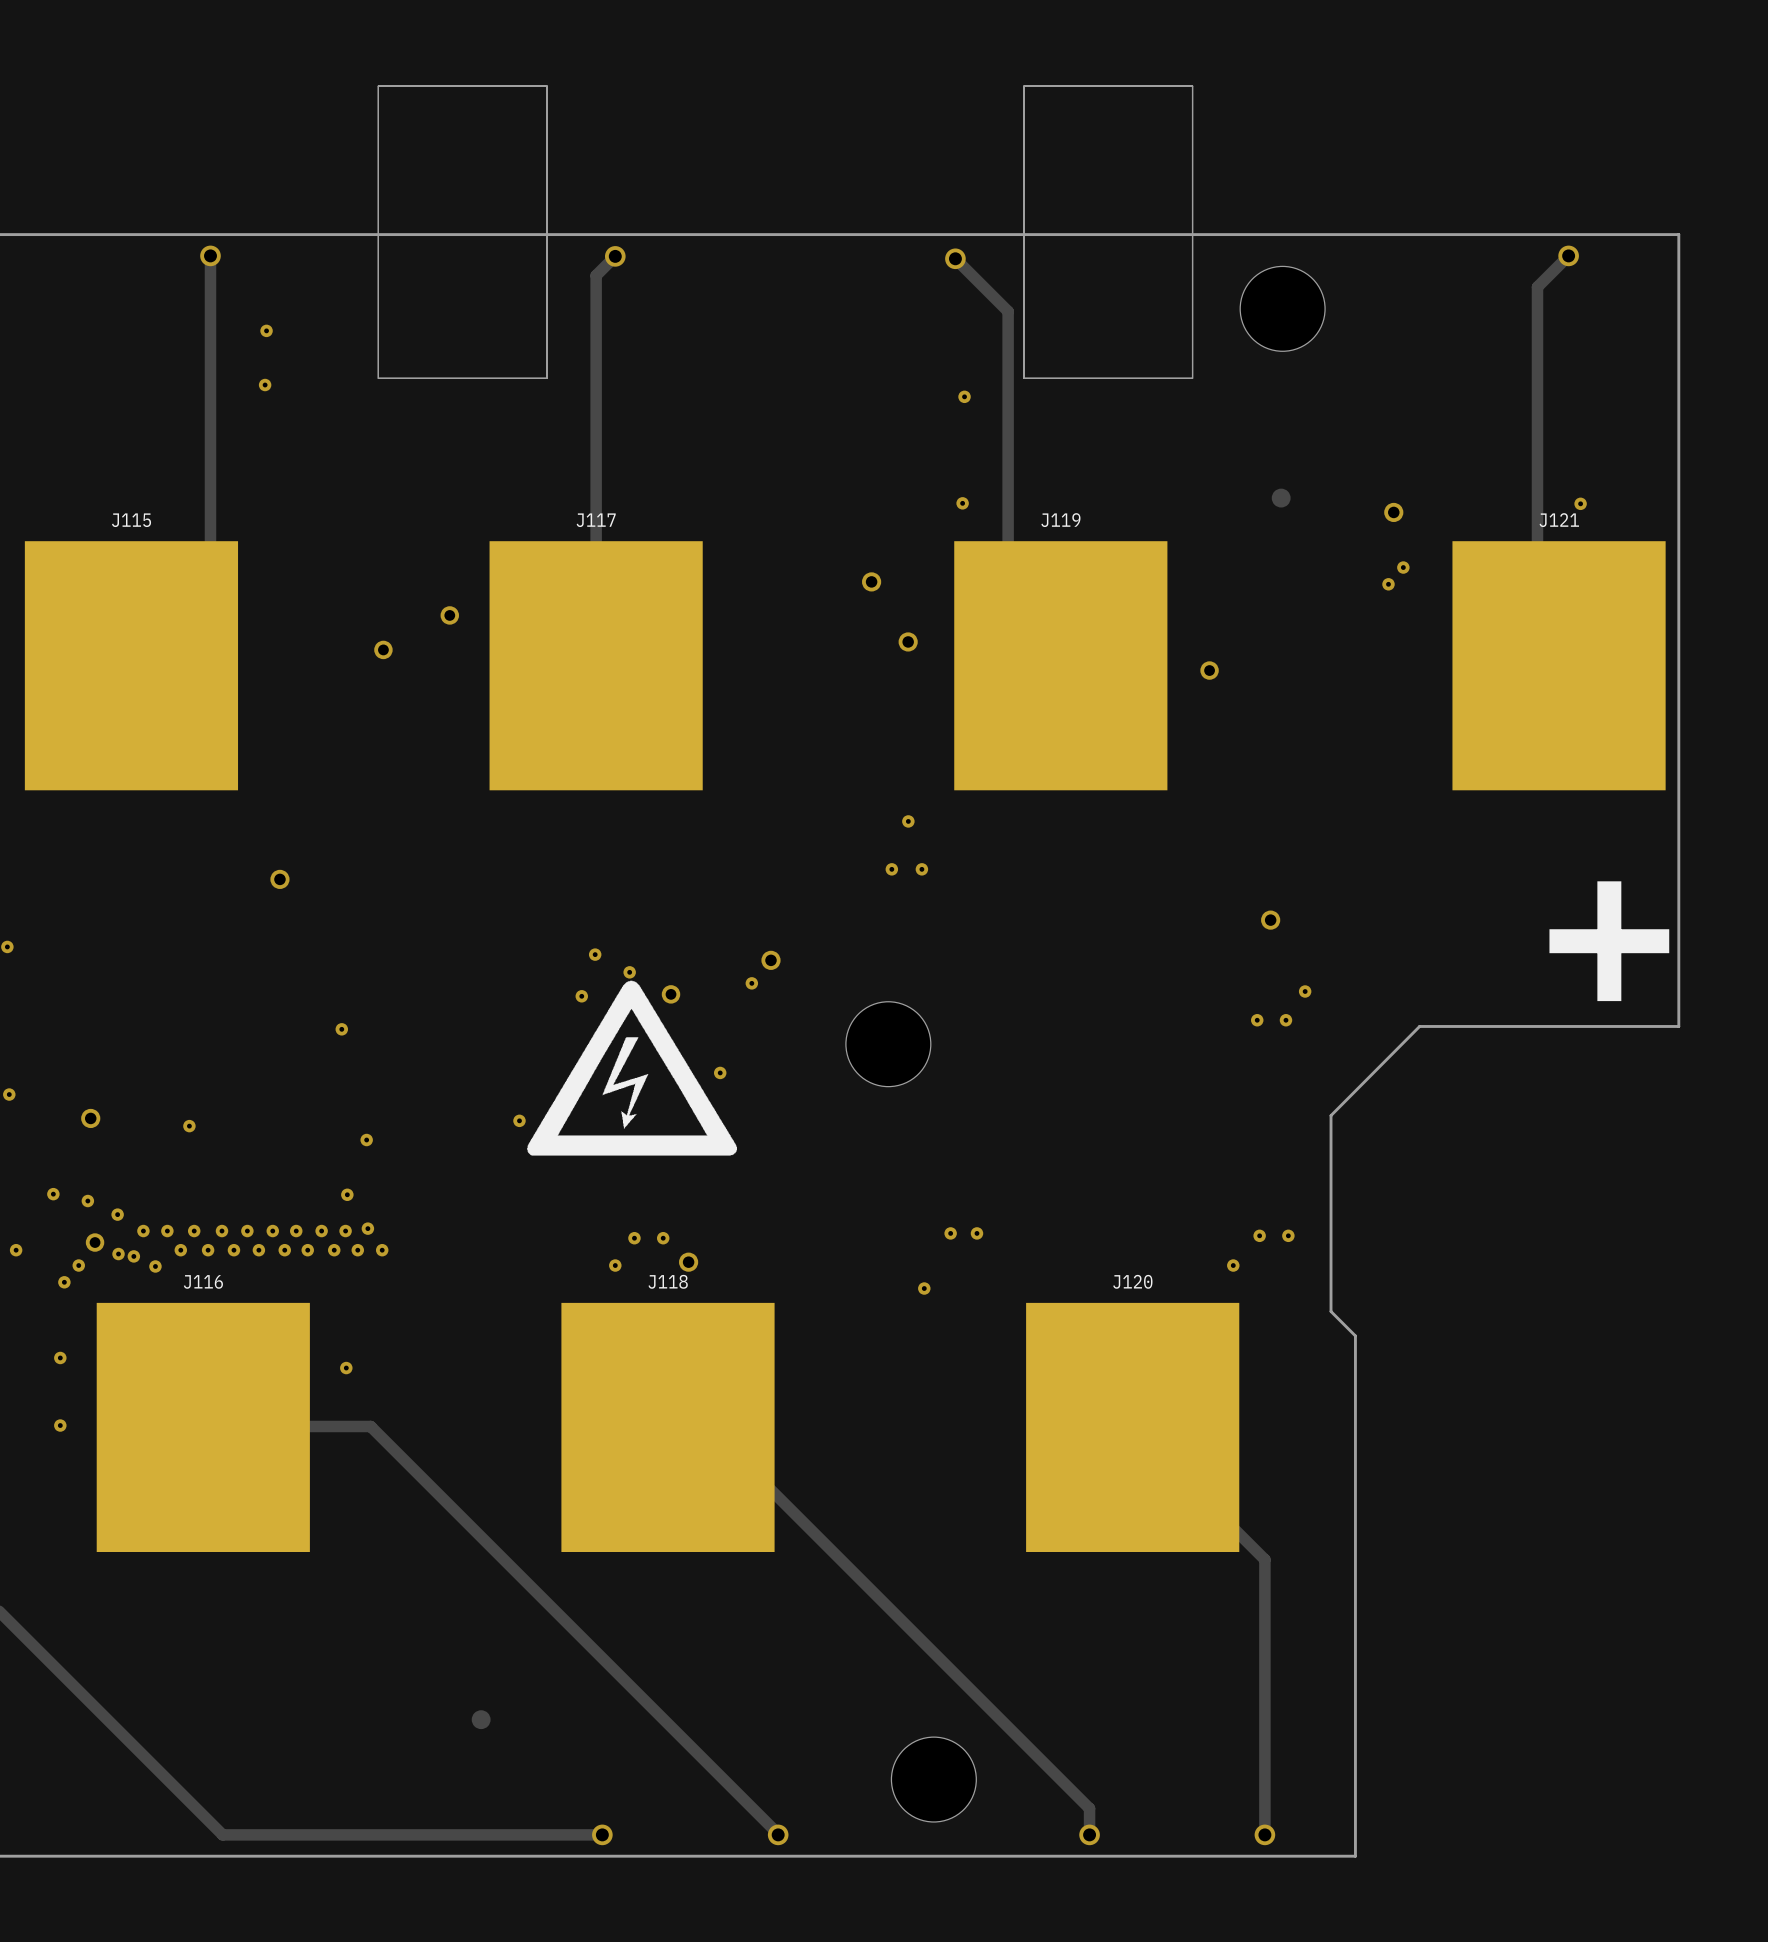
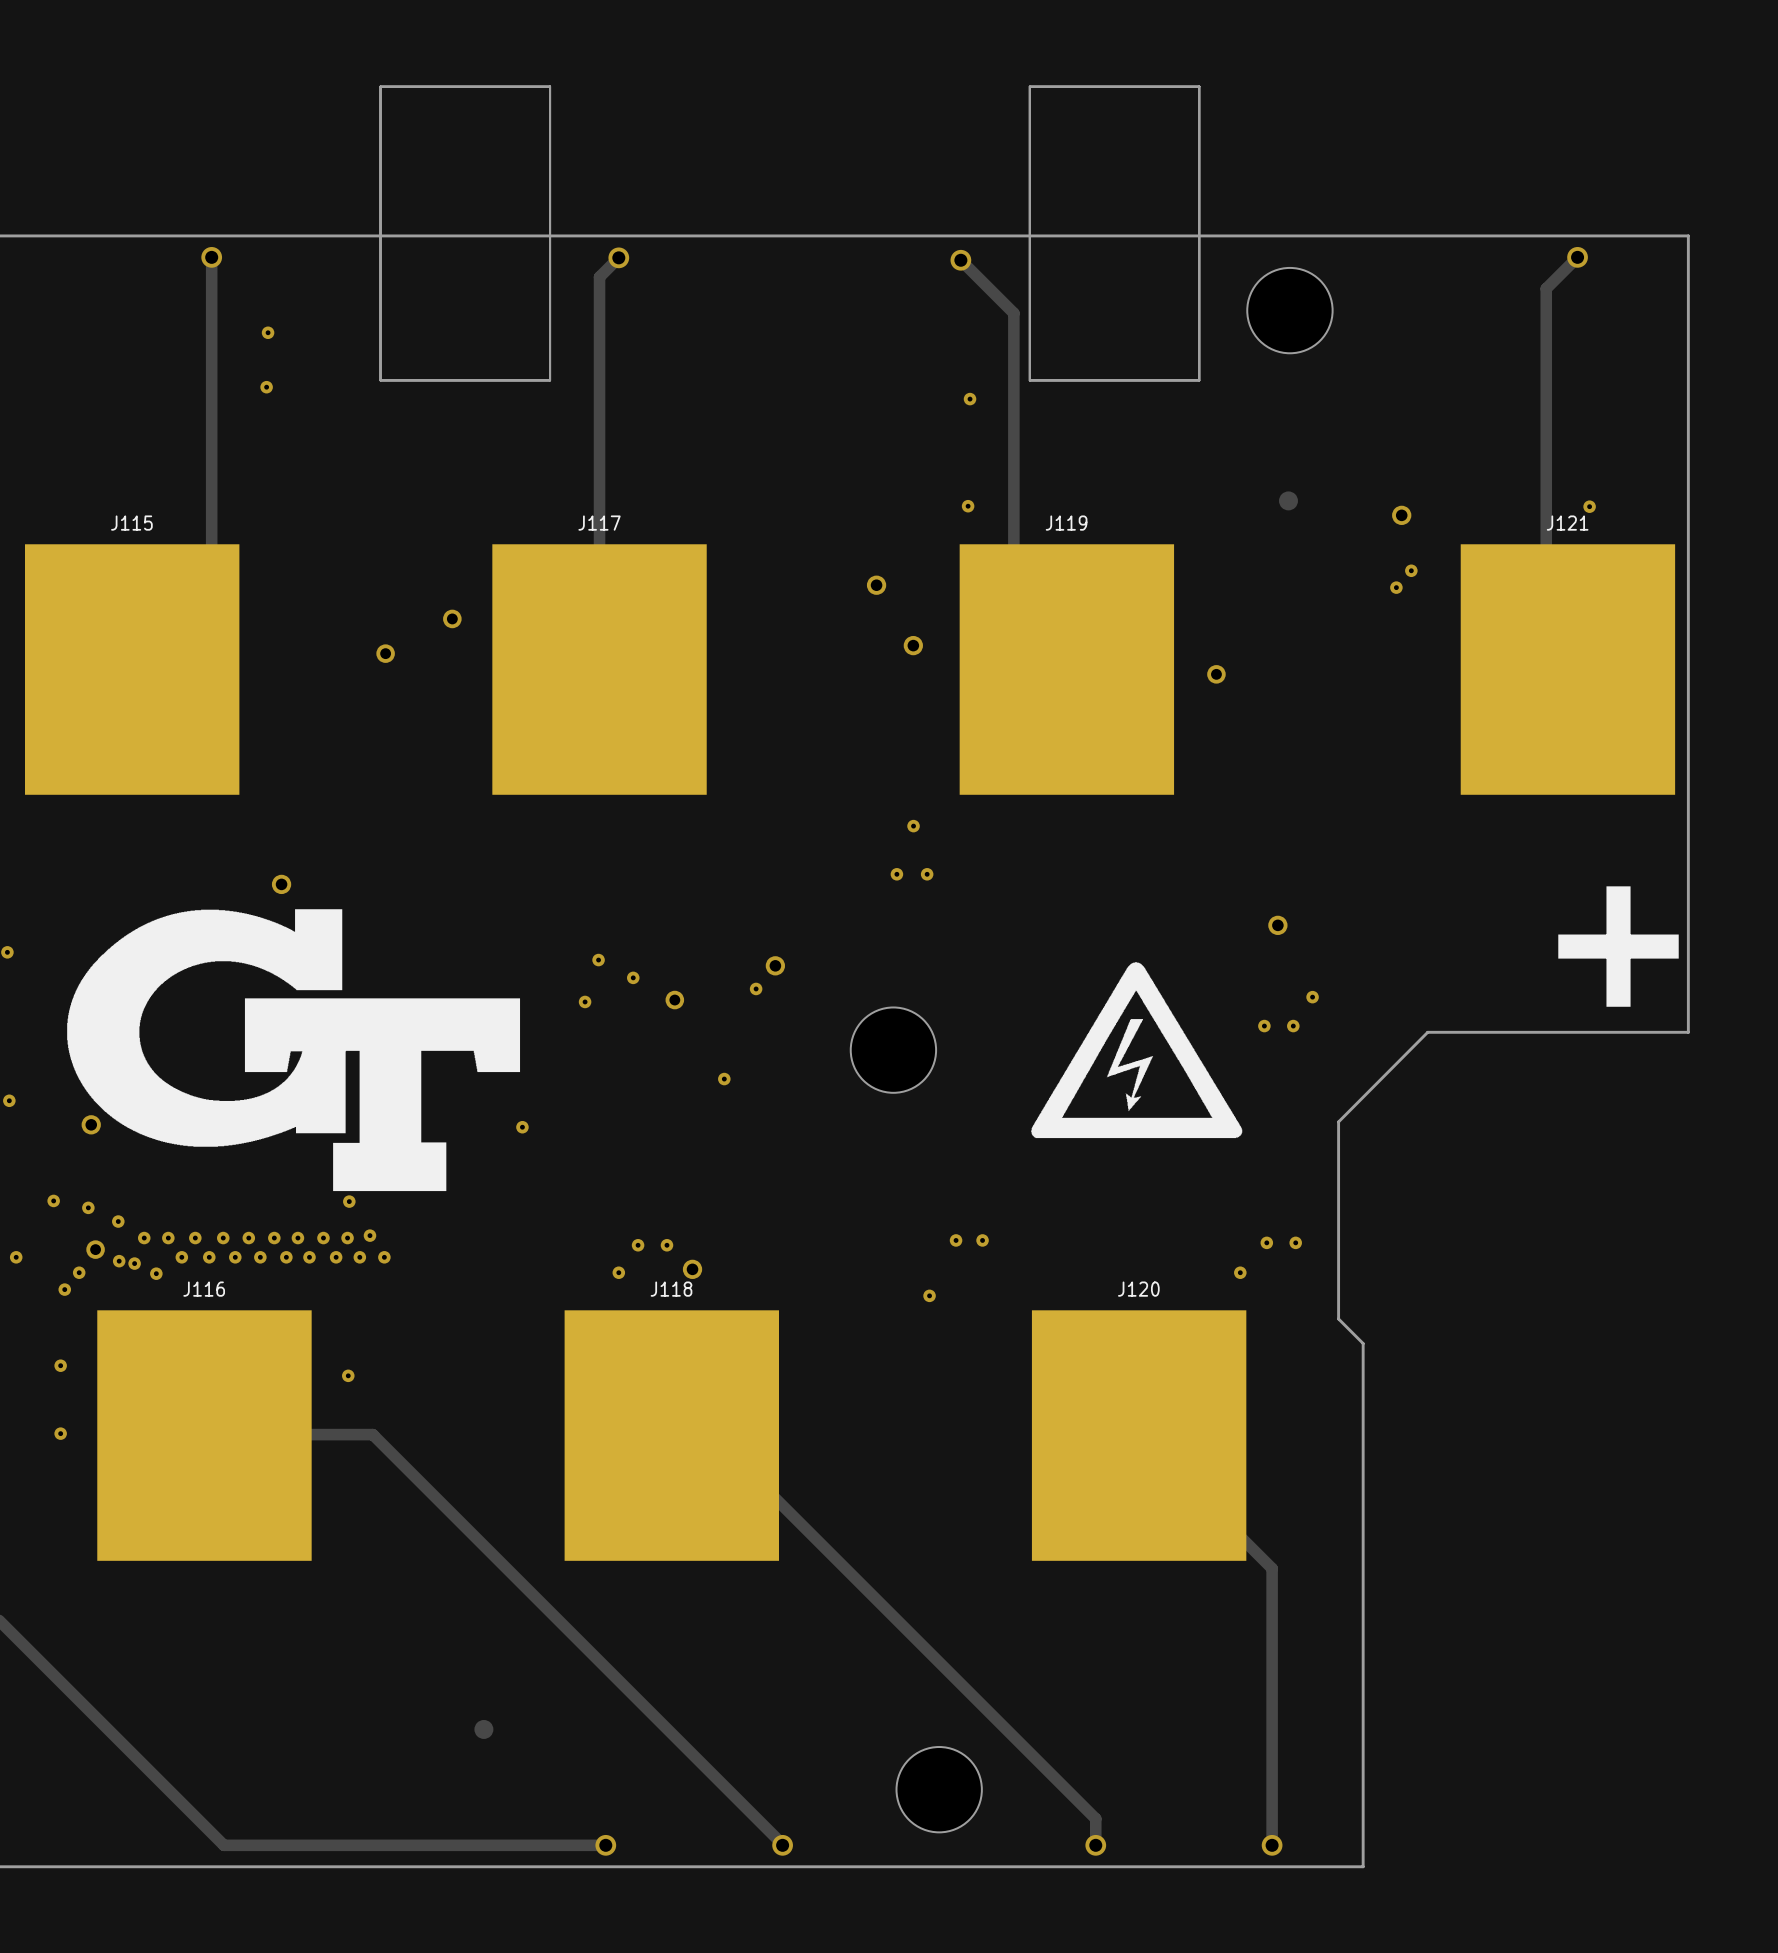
drawing: none -> [67, 909, 521, 1192]
drawing: none -> [1031, 962, 1243, 1139]
drawing: [527, 980, 737, 1156] -> none

